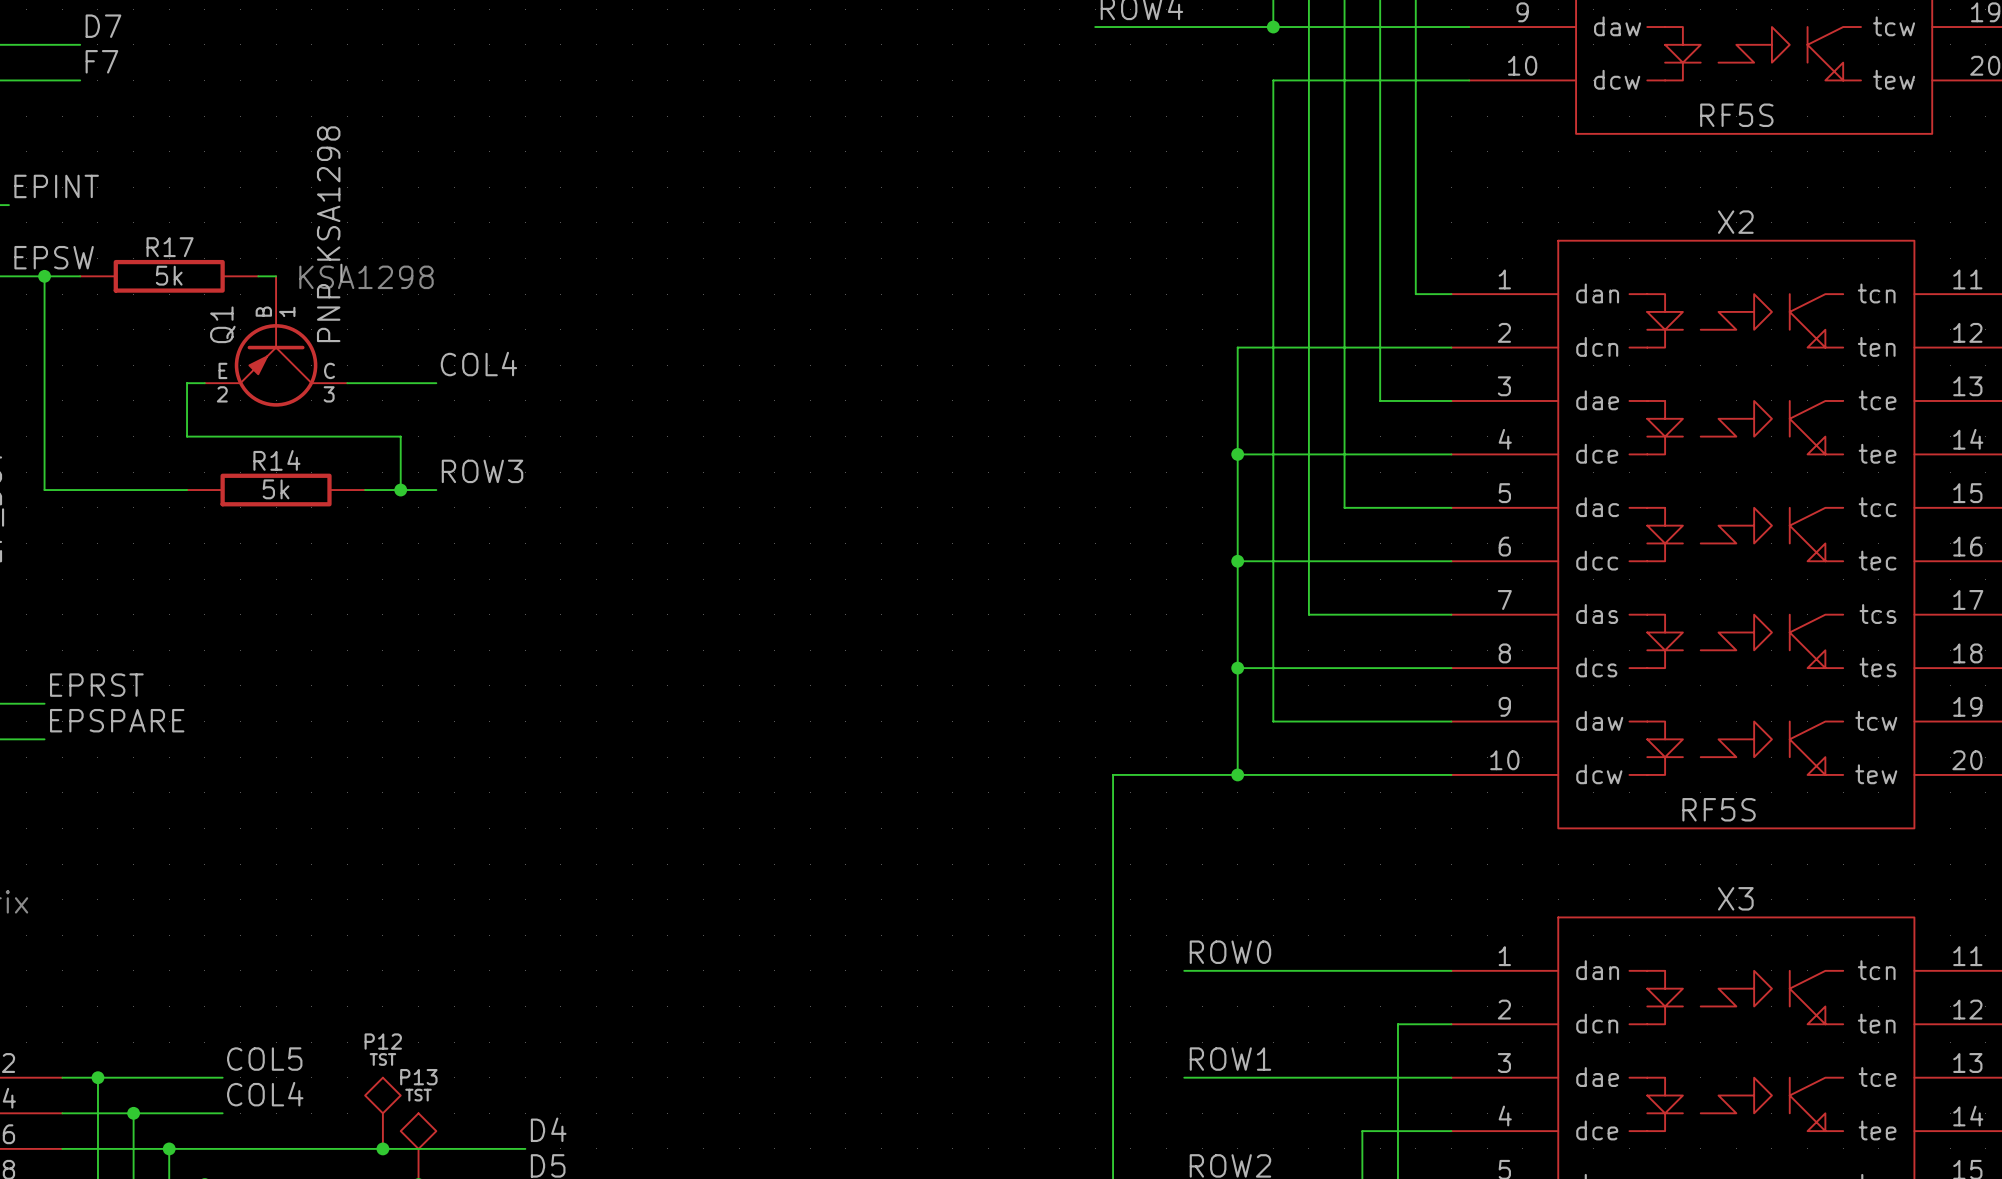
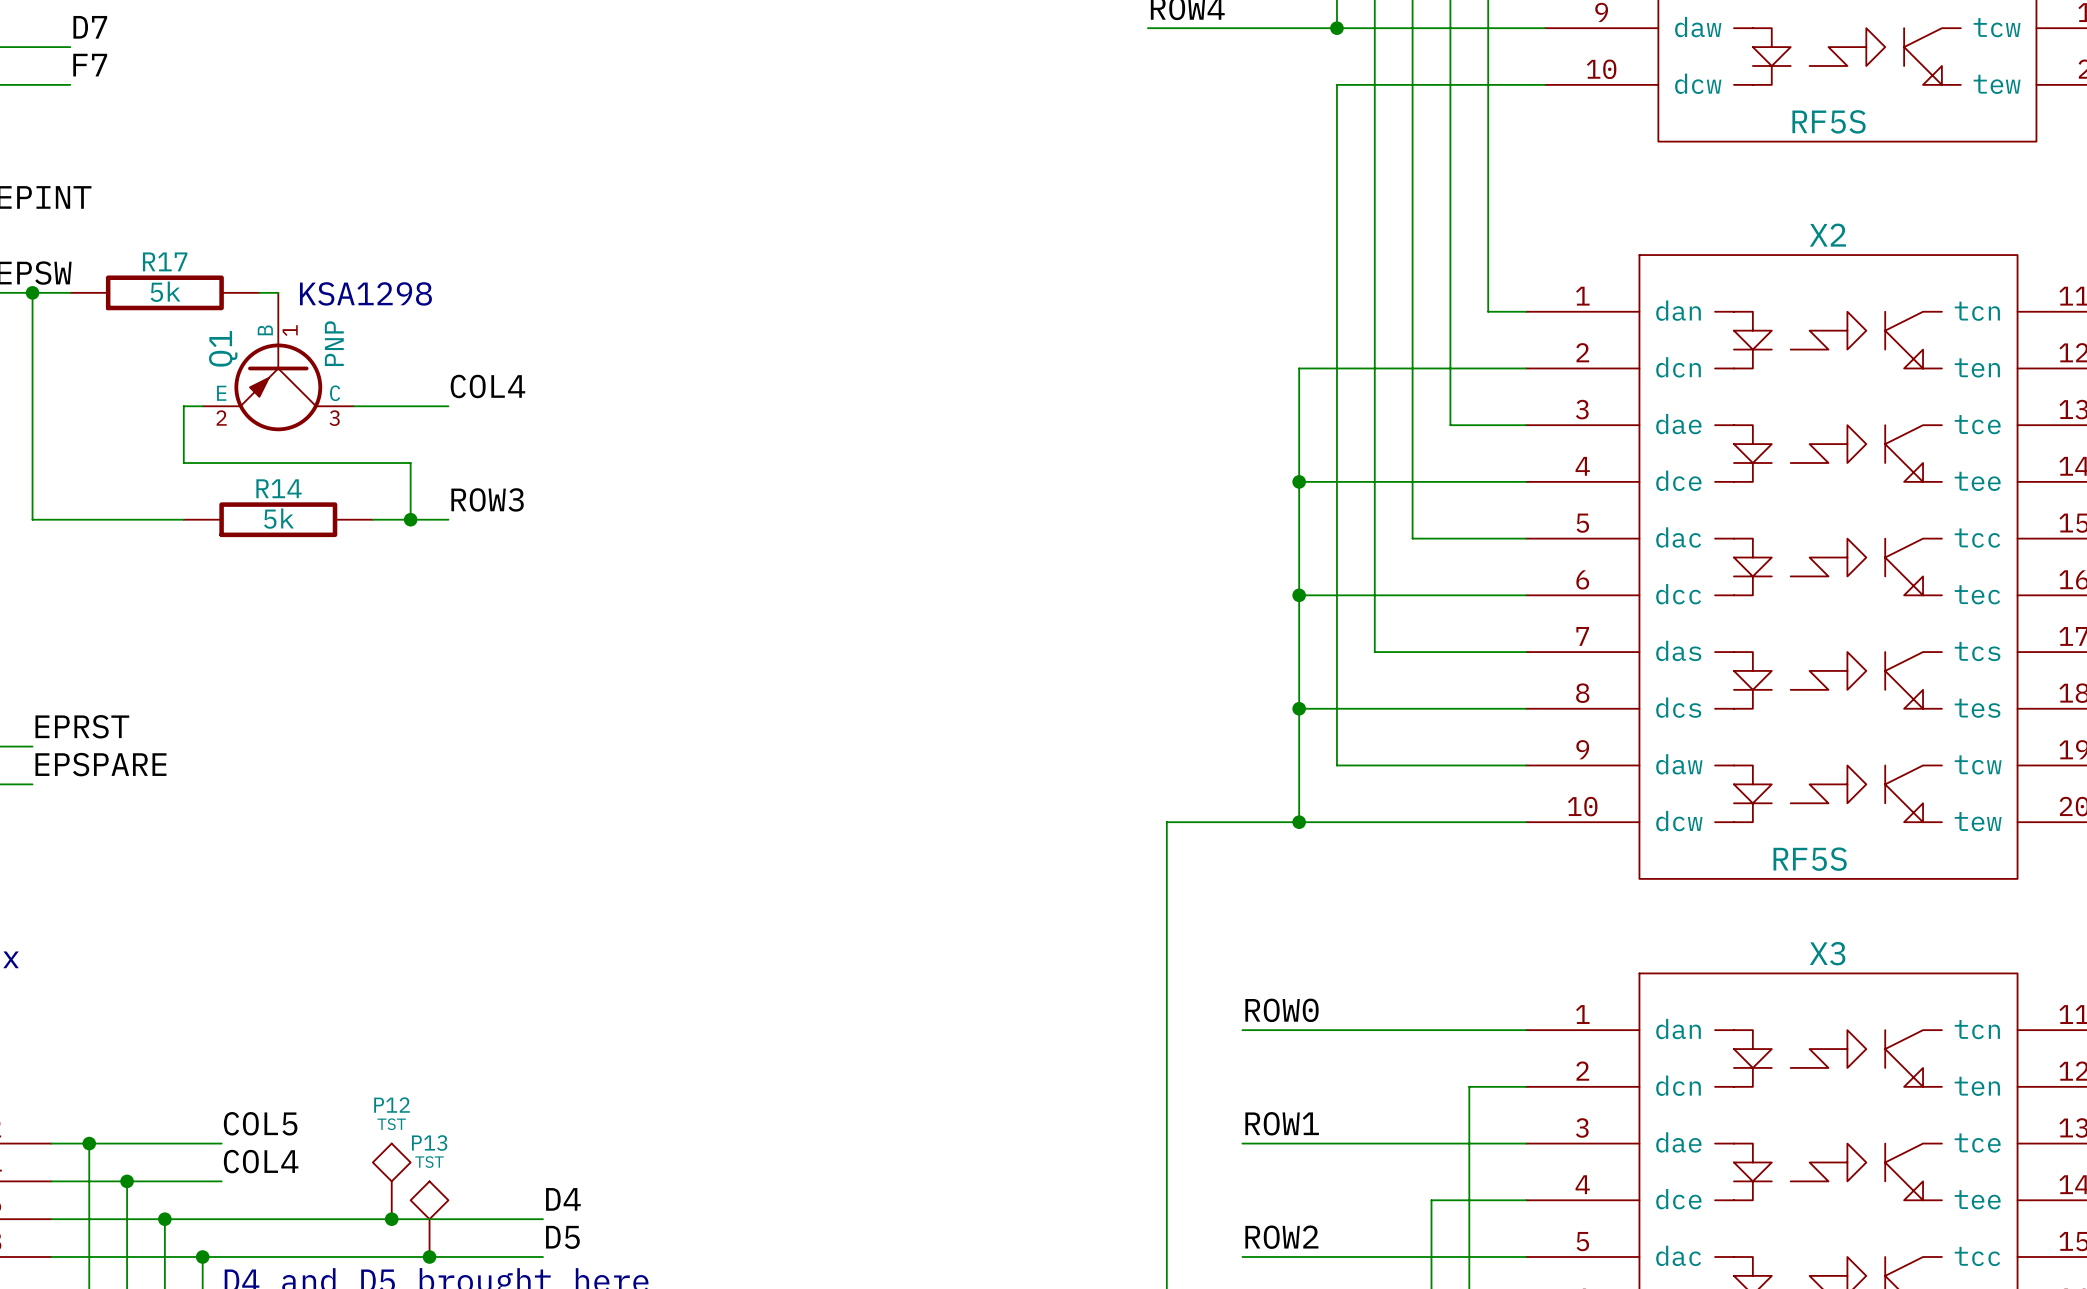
Q1 value: PNP_KSA1298 (329, 234) -> PNP (334, 343)

